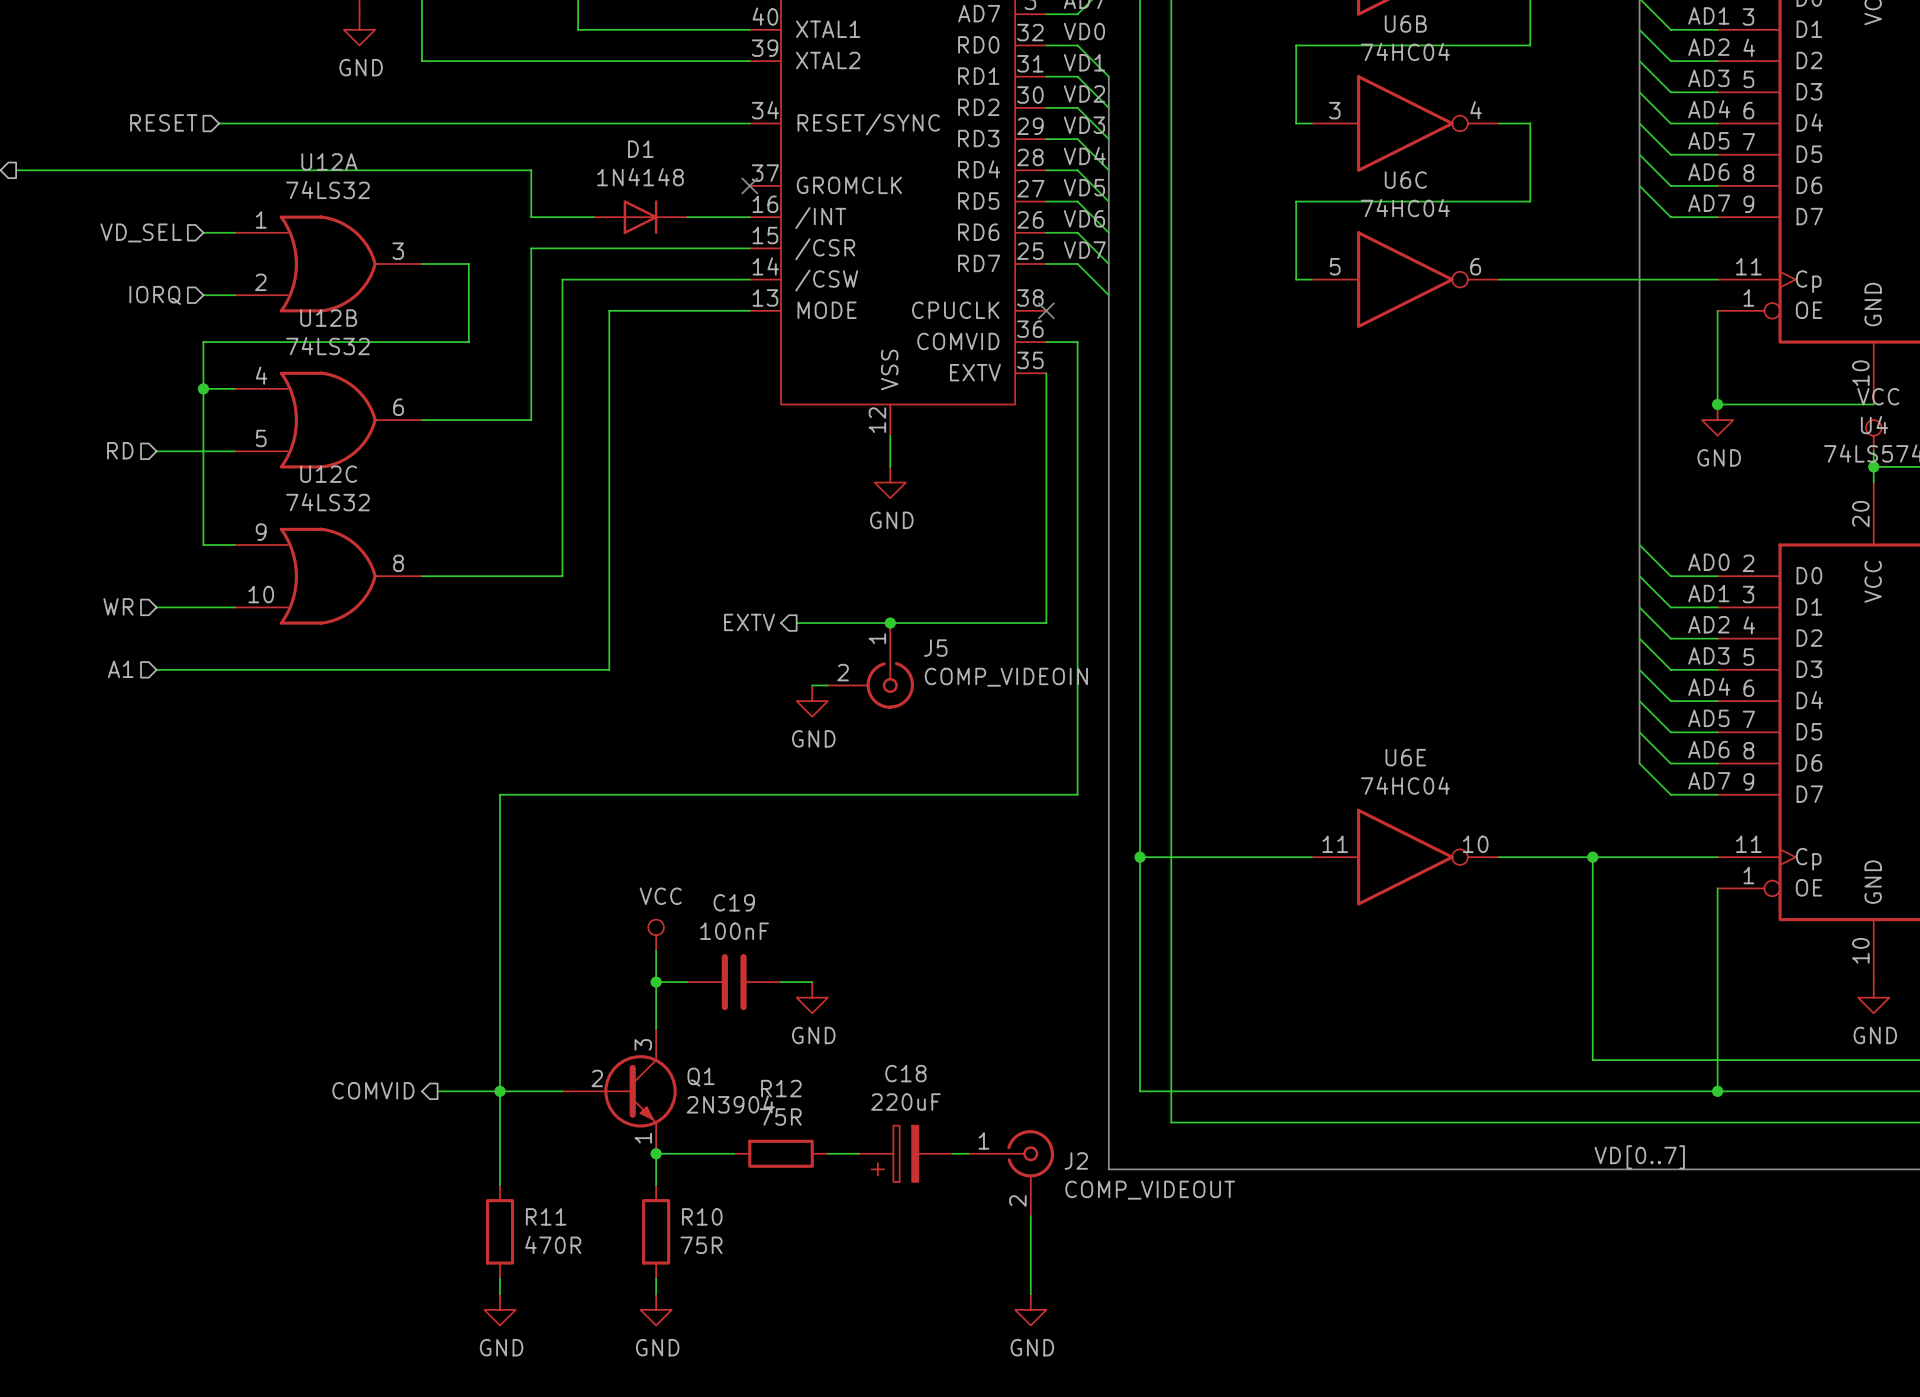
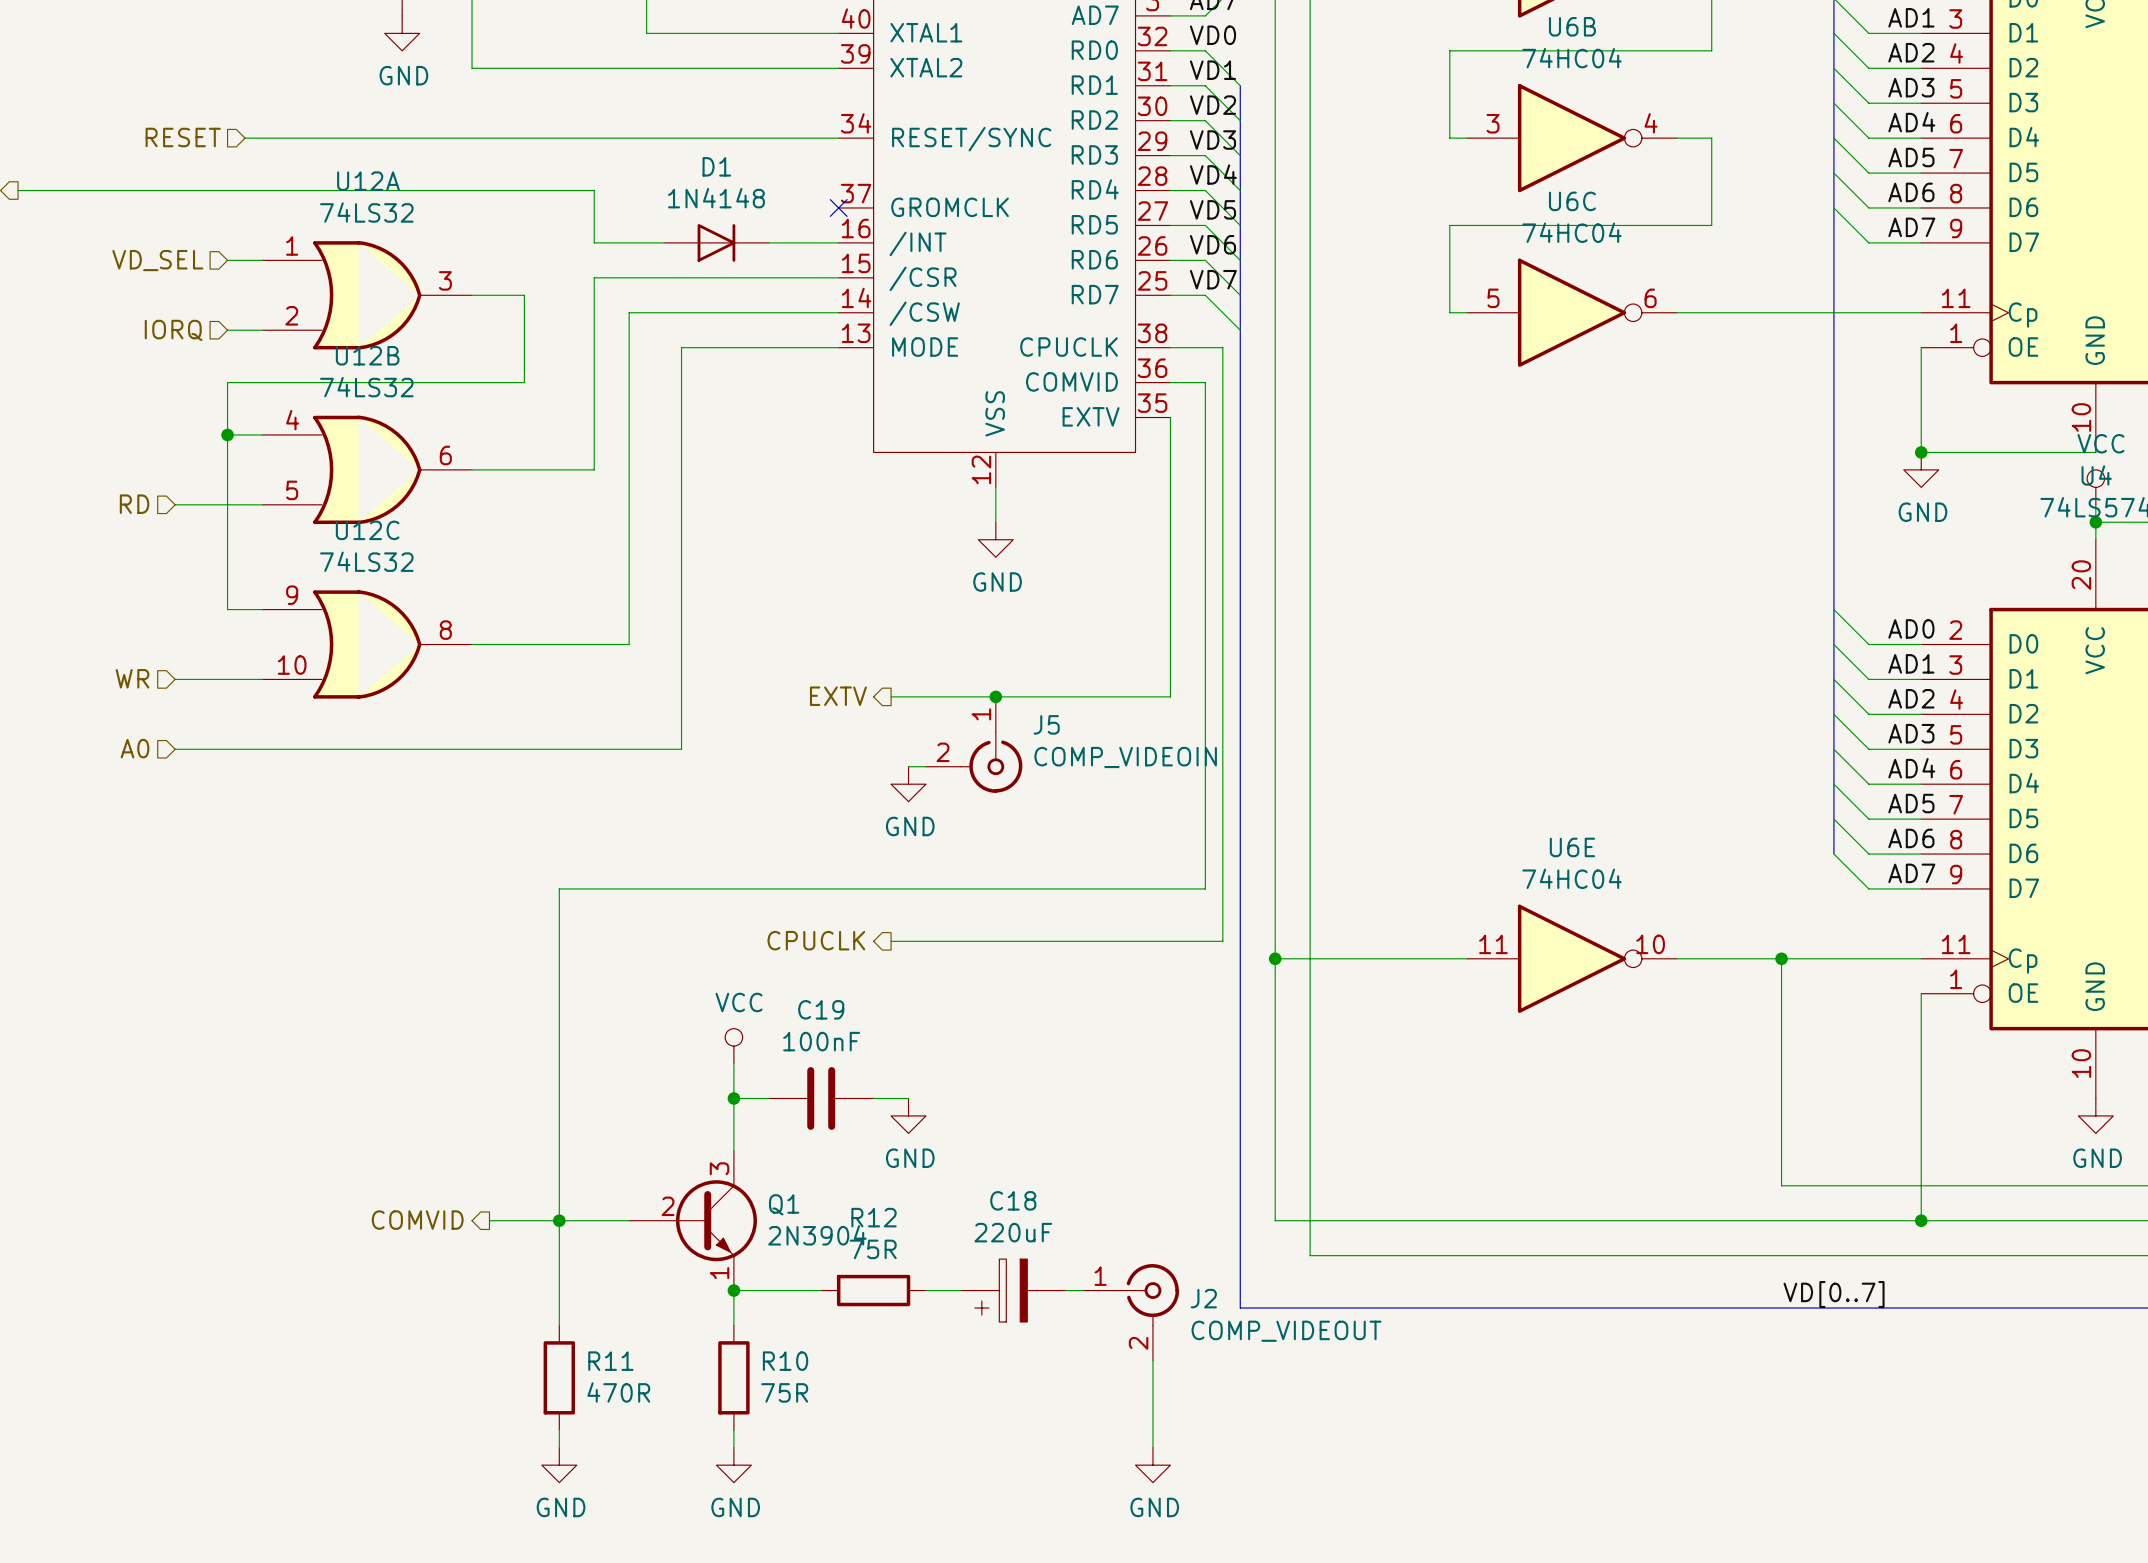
wire: none -> (1170, 347) (1222, 347) (1222, 941) (891, 941)
no-connect mark: (1046, 310) -> none
hierarchical label: A1 (120, 669) -> A0 (134, 748)
hierarchical label: none -> CPUCLK (816, 940)

